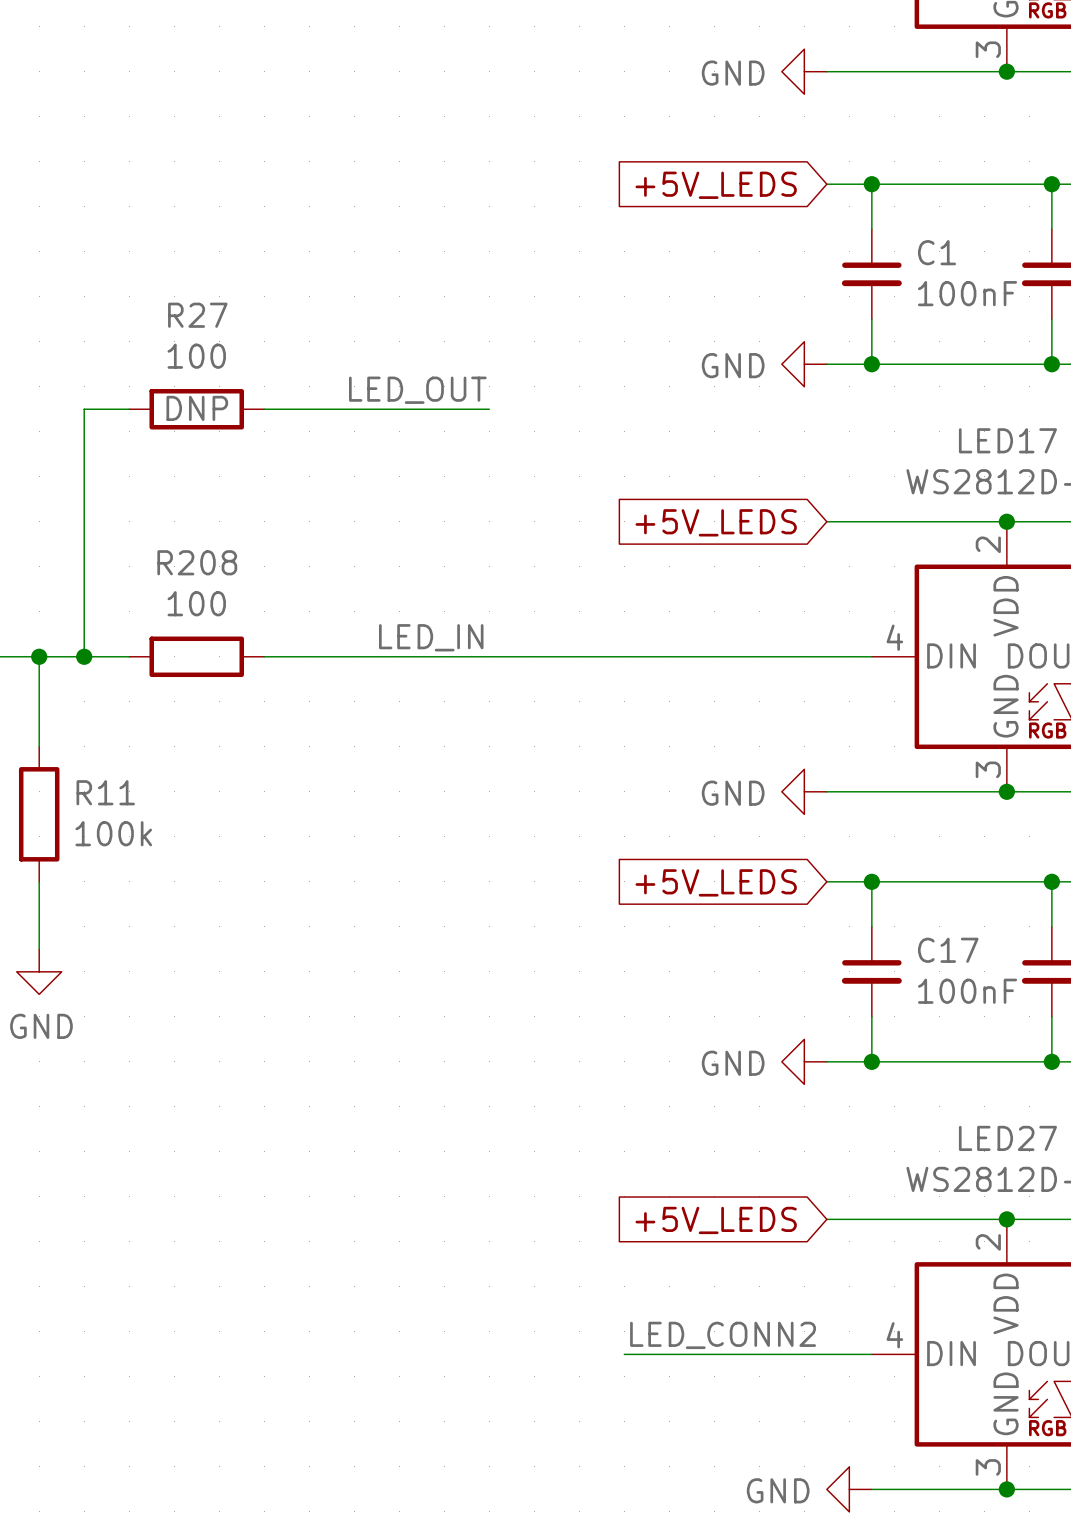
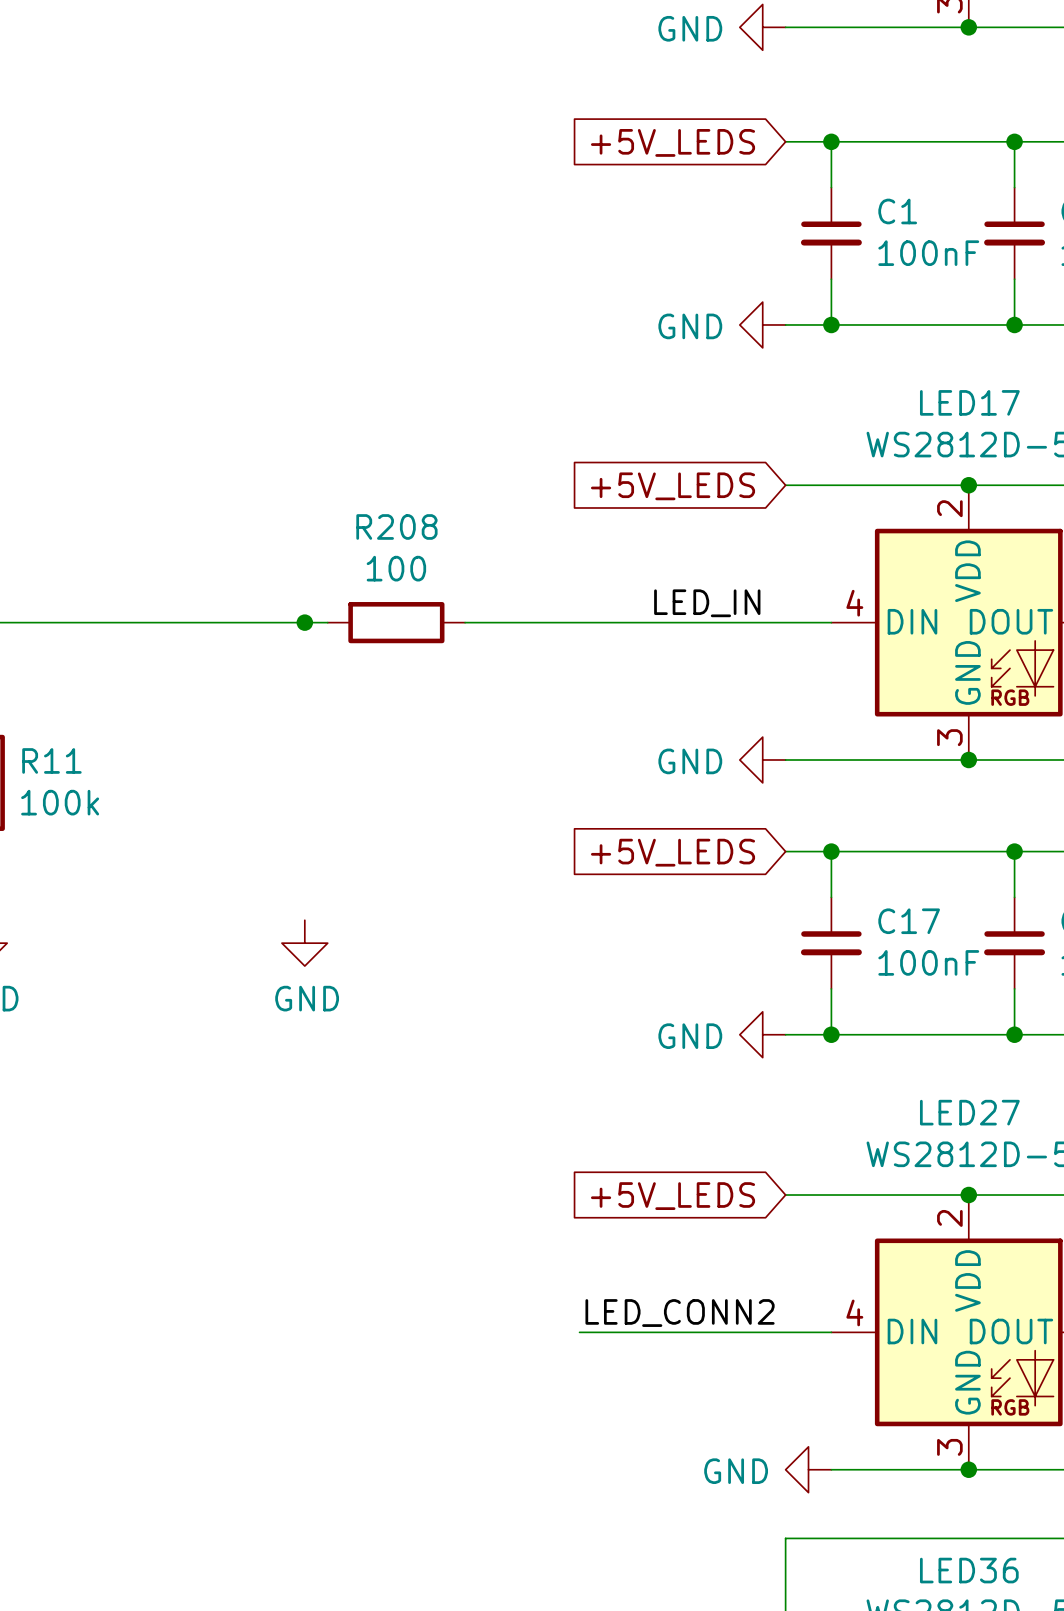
label: LED_OUT (417, 390) -> none
wire: (129, 409) (84, 409) (84, 656) -> none
R27: 100 (196, 409) -> none
wire: (264, 409) (489, 409) -> none
label position: LED_IN (431, 637) -> LED_IN (707, 603)
junction: (84, 656) -> none
R208 position: (196, 656) -> (396, 622)
junction: none -> (304, 622)
wire: (376, 656) (511, 656) -> (75, 622) (213, 622)
power symbol: none -> GND (304, 943)

